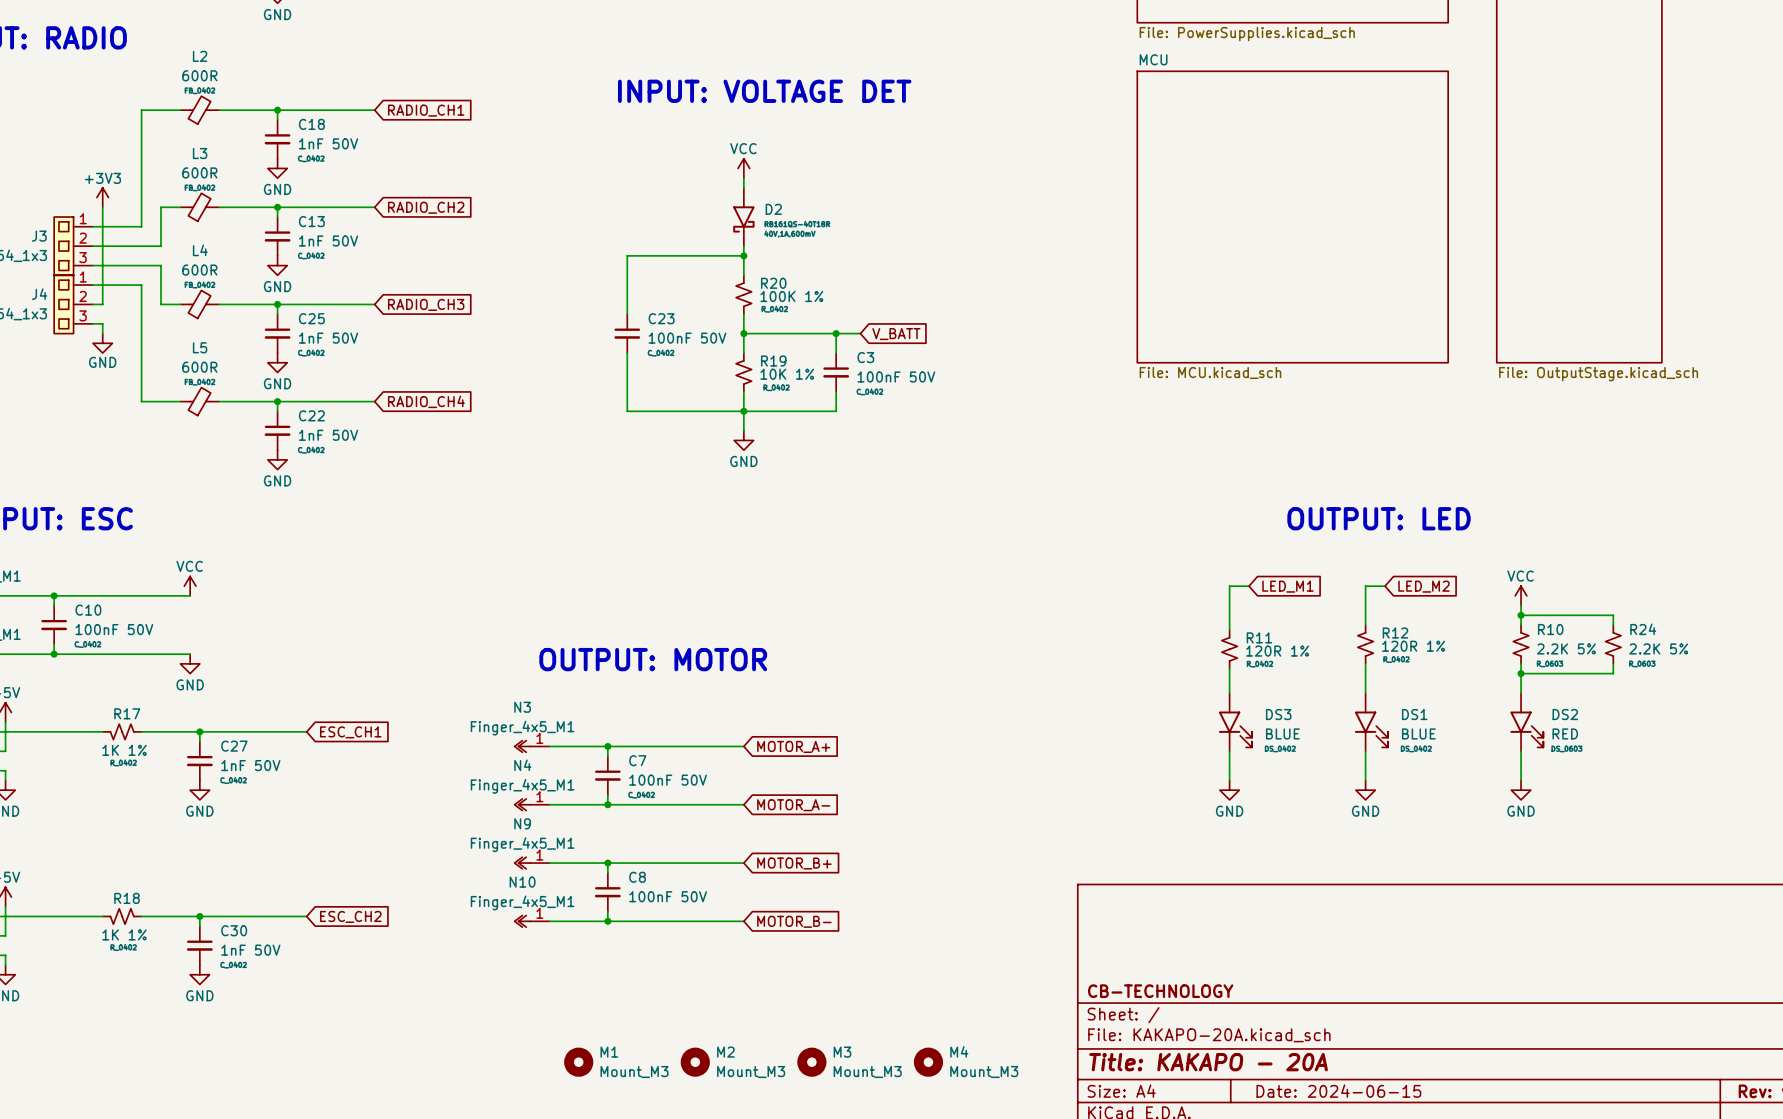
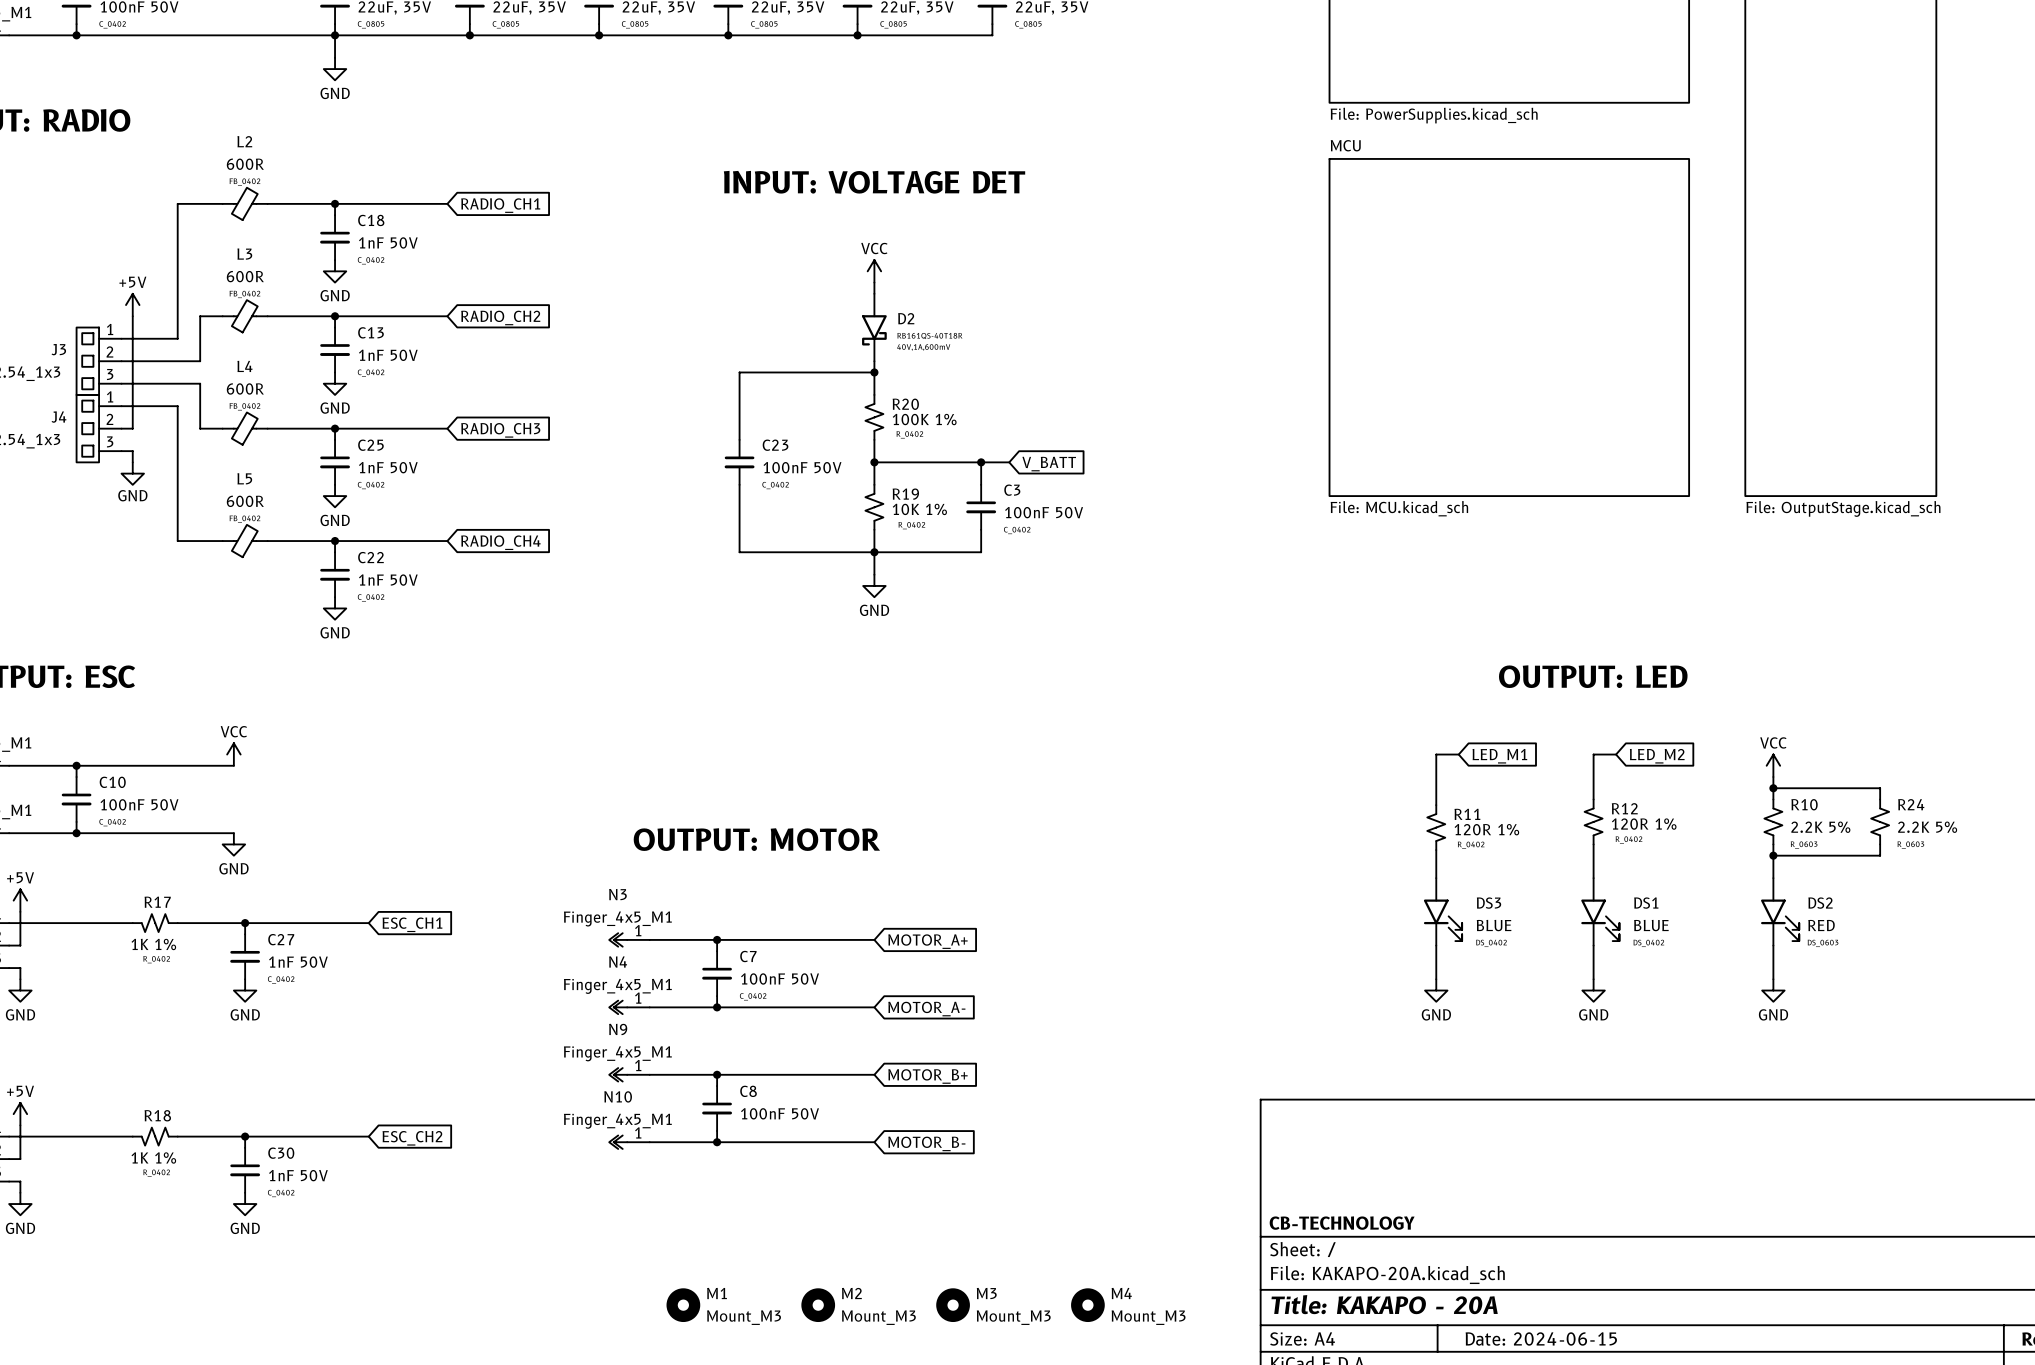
power symbol: +3V3 (102, 197) -> +5V (132, 305)

